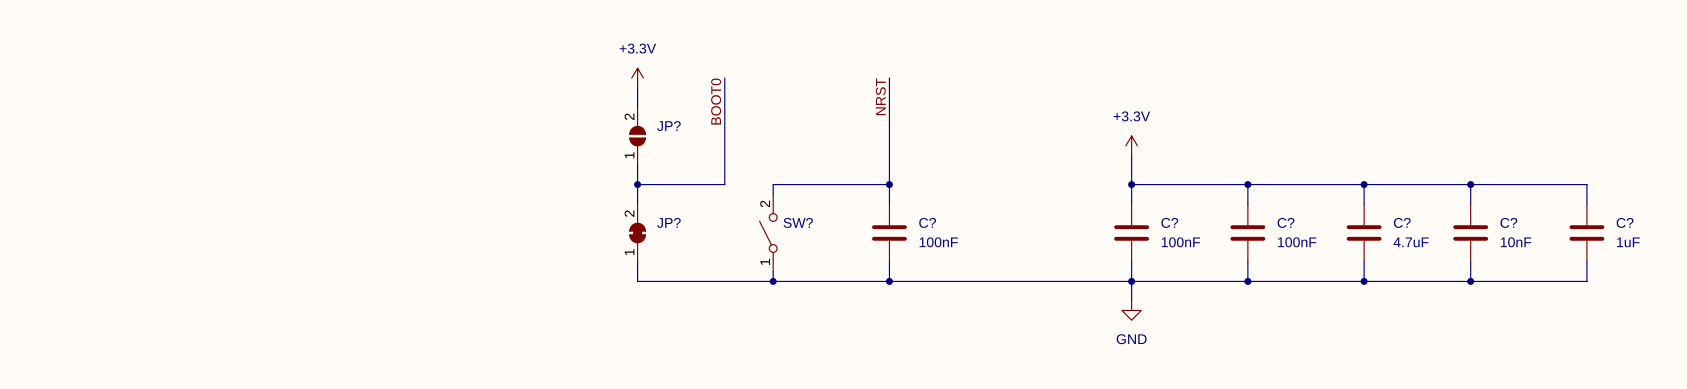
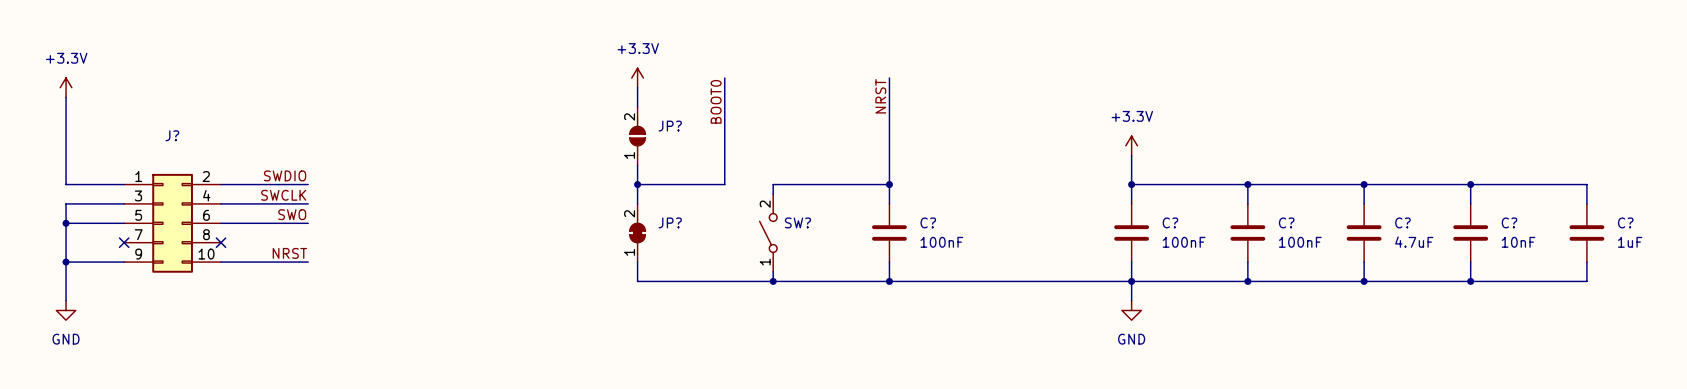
power symbol: none -> +3.3V (66, 87)
wire: none -> (66, 97) (66, 184) (124, 184)
label: none -> SWDIO (285, 175)
wire: none -> (221, 184) (308, 184)
label: none -> SWCLK (283, 195)
wire: none -> (124, 203) (66, 203) (66, 300)
wire: none -> (221, 203) (308, 203)
label: none -> SWO (292, 214)
wire: none -> (66, 223) (124, 223)
junction: none -> (66, 223)
J?: none -> (172, 223)
wire: none -> (221, 223) (308, 223)
no-connect mark: none -> (124, 242)
no-connect mark: none -> (221, 242)
label: none -> NRST (289, 253)
wire: none -> (66, 262) (124, 262)
junction: none -> (66, 262)
wire: none -> (221, 262) (308, 262)
power symbol: none -> GND (66, 310)

